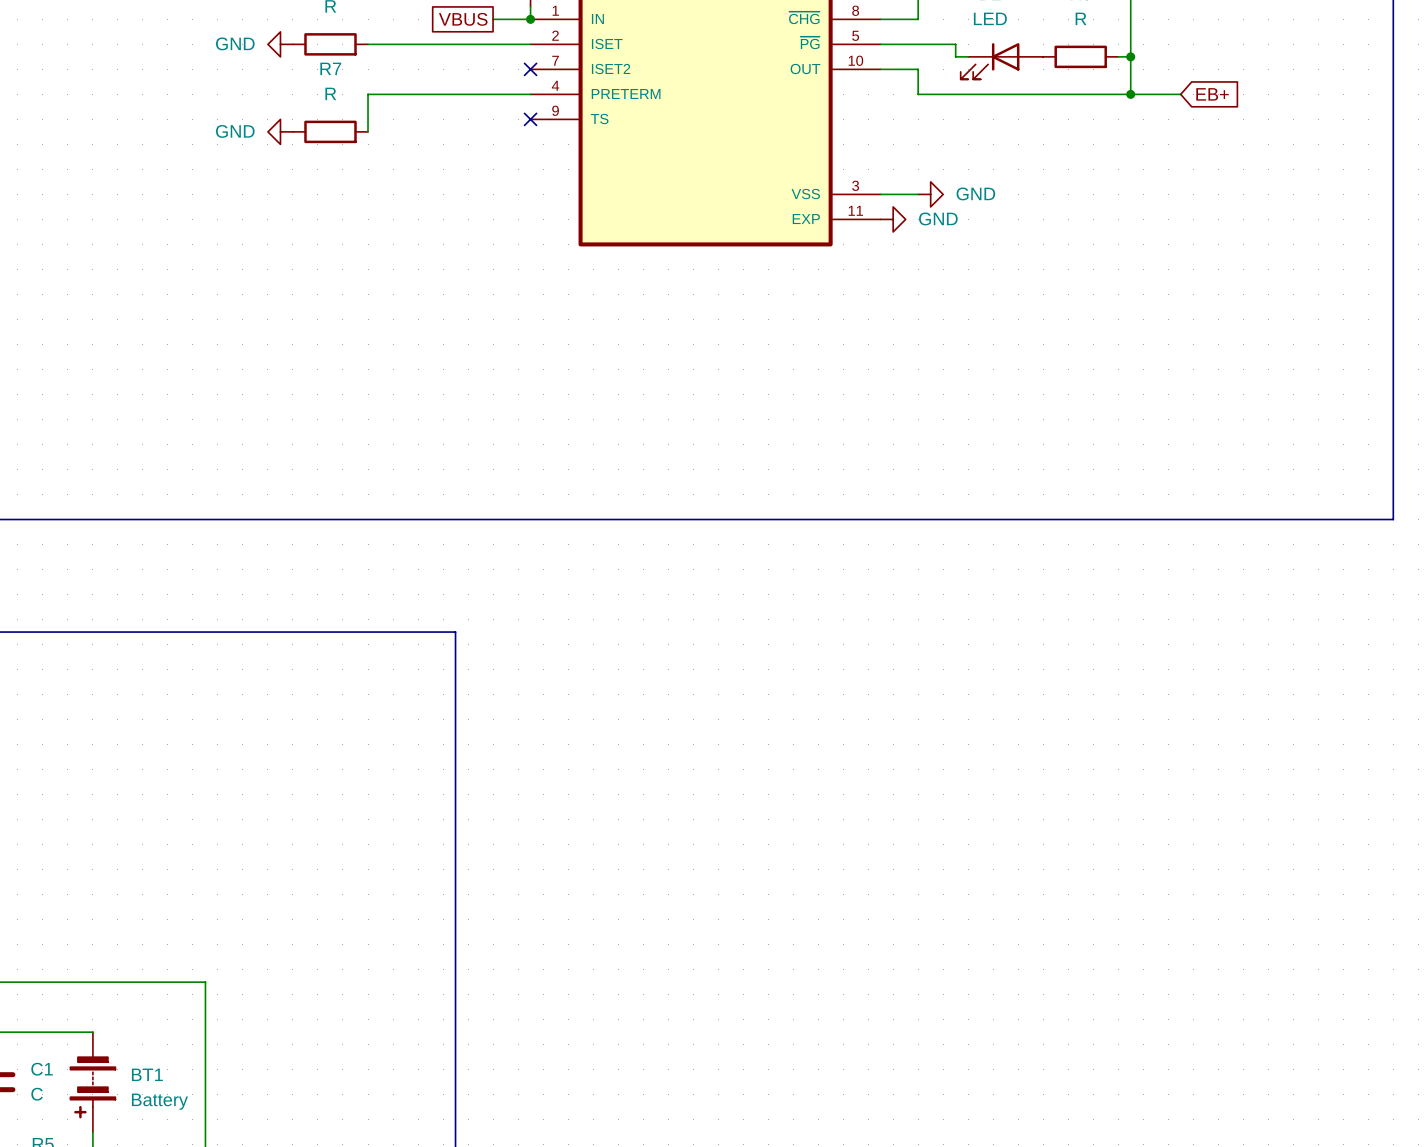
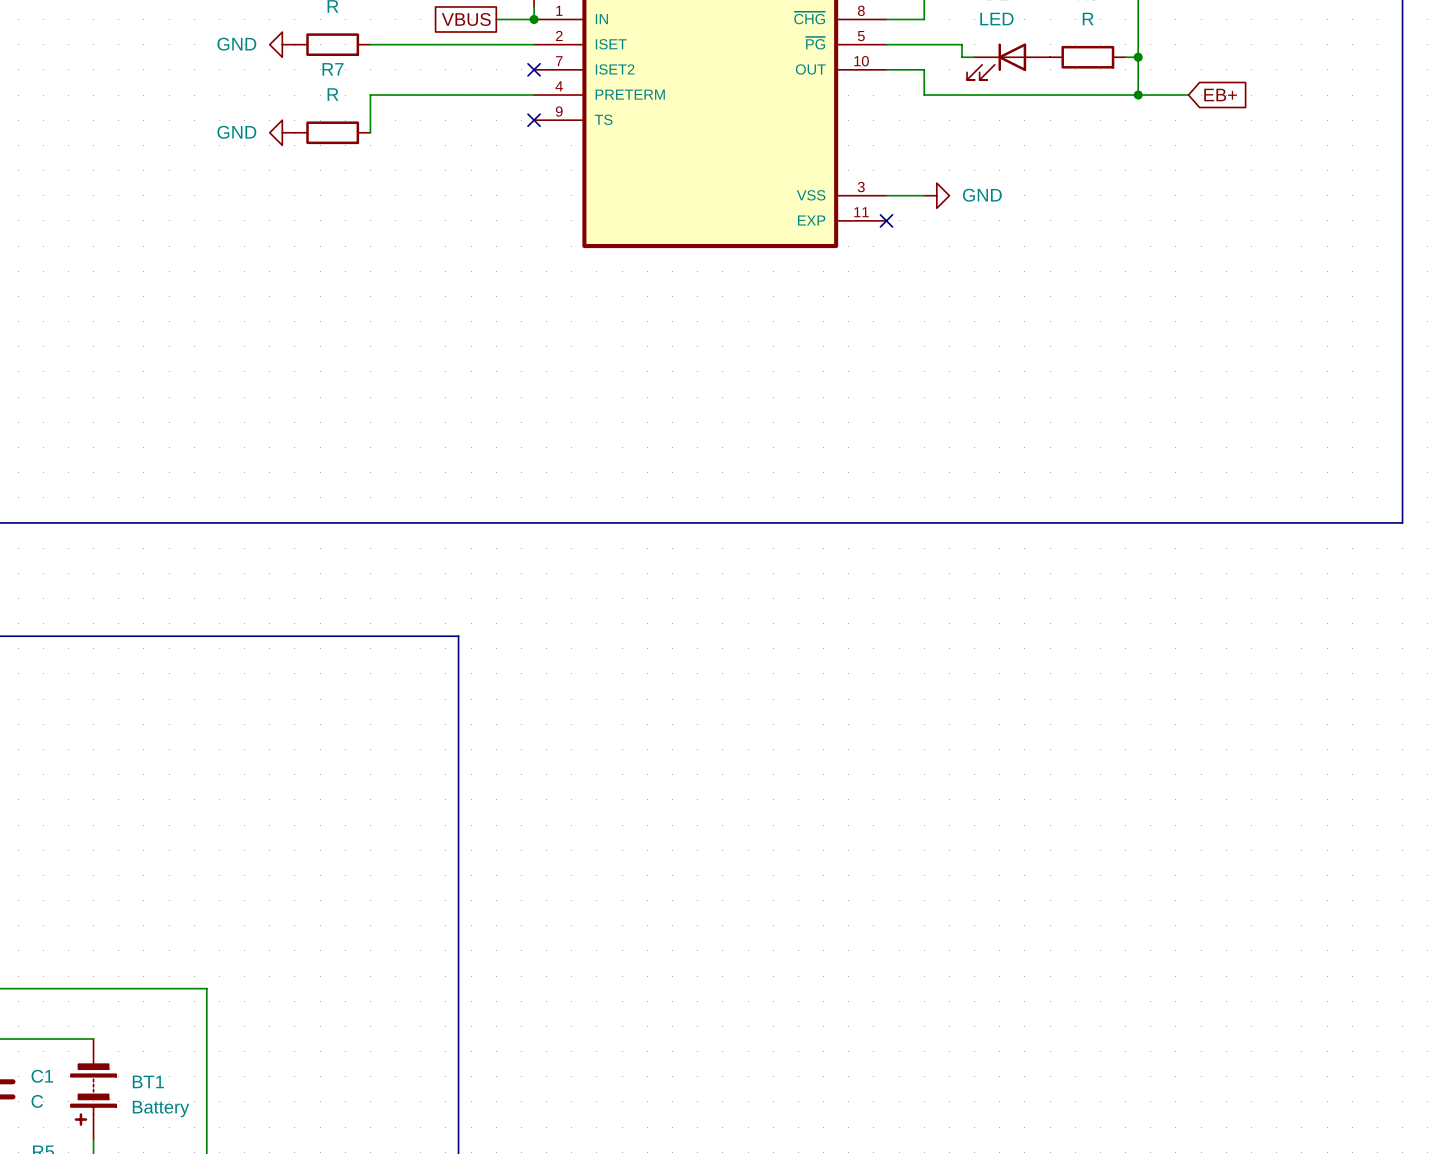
no-connect mark: none -> (886, 220)
power symbol: GND (893, 219) -> none

